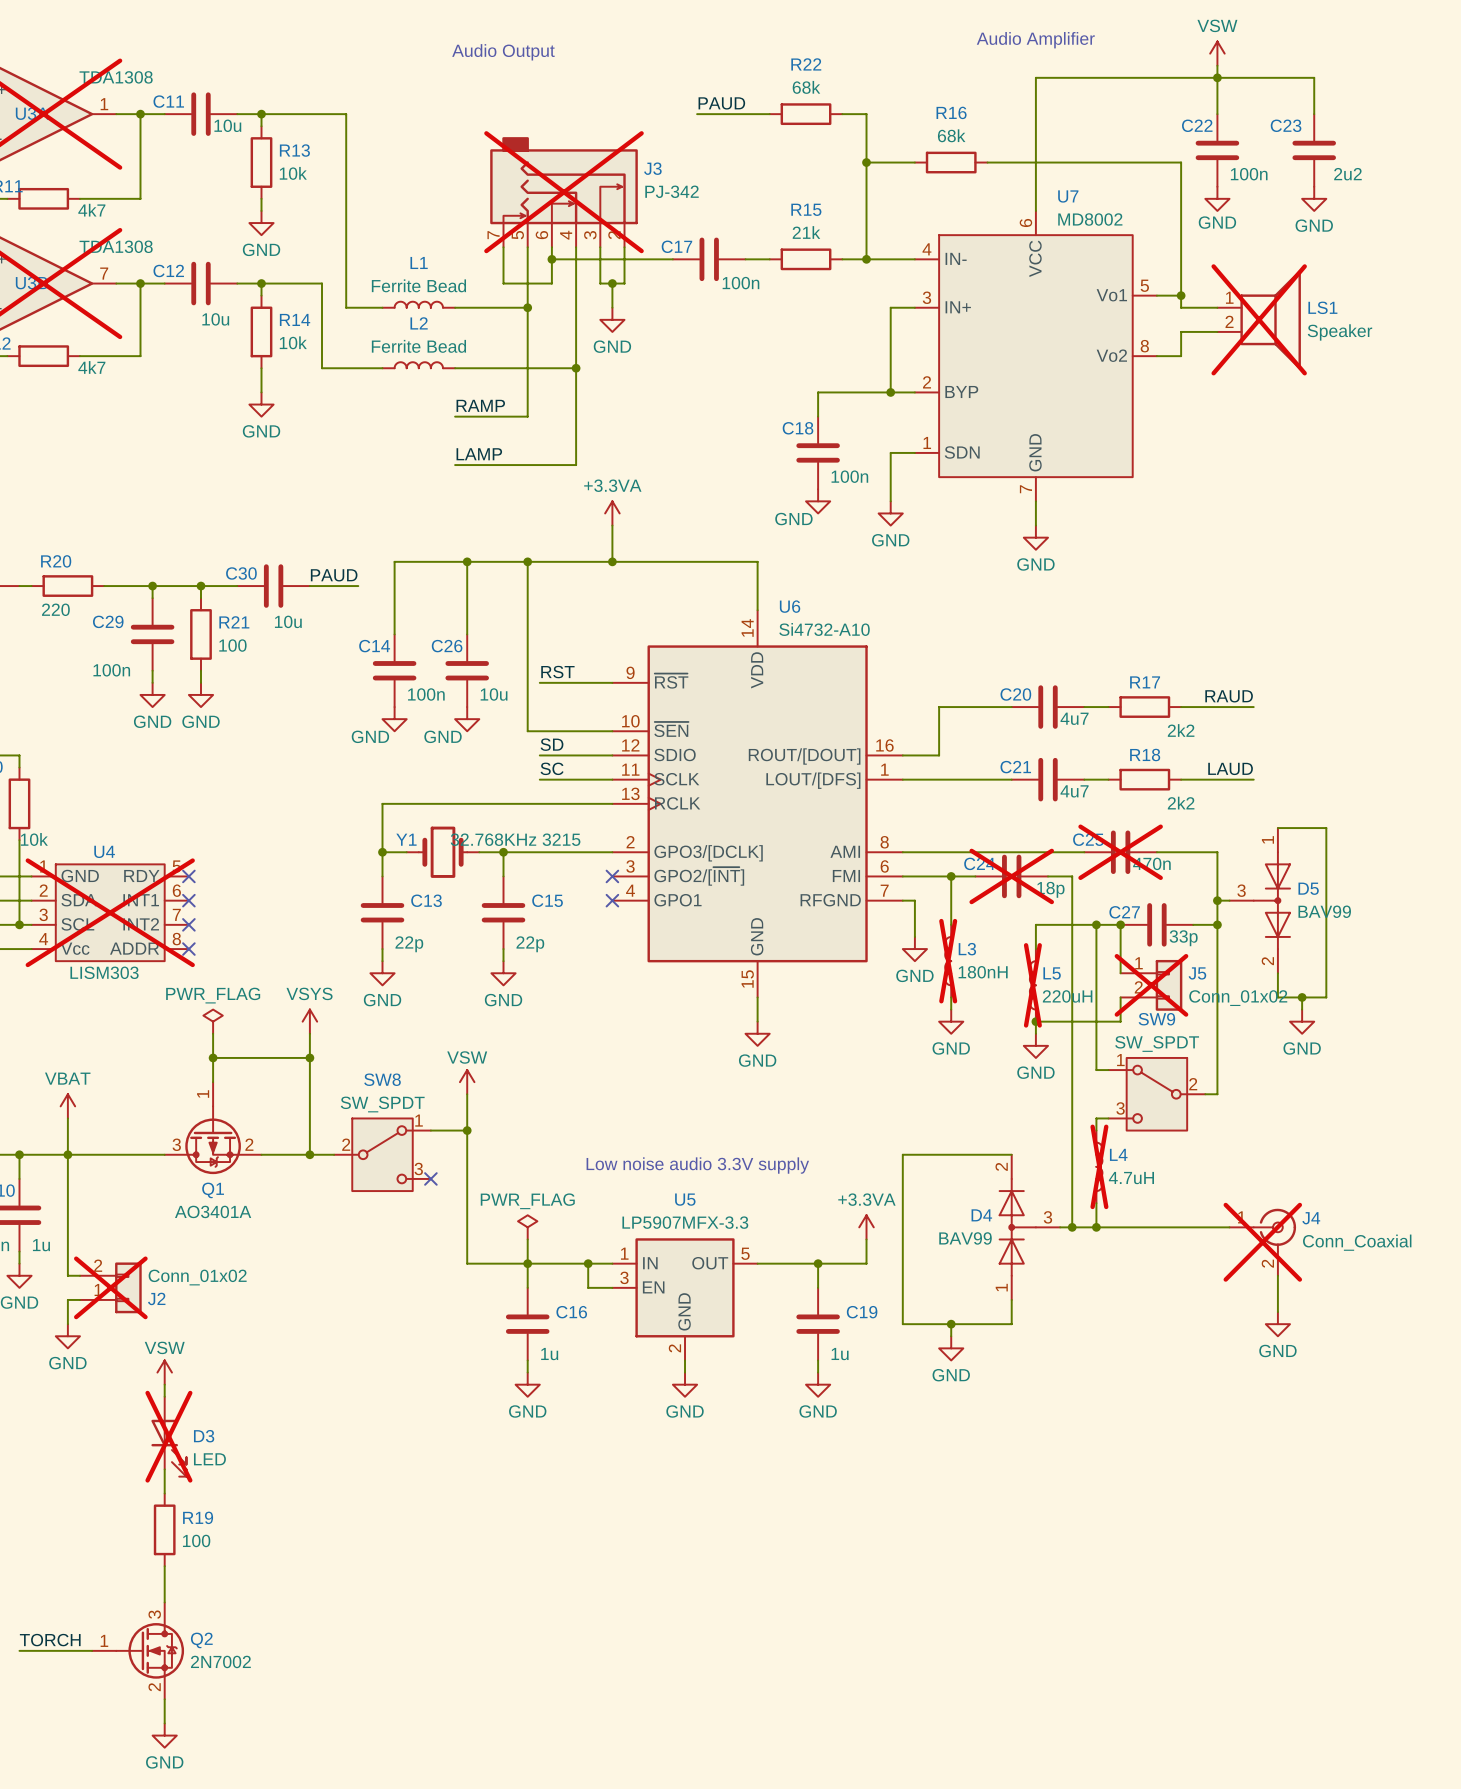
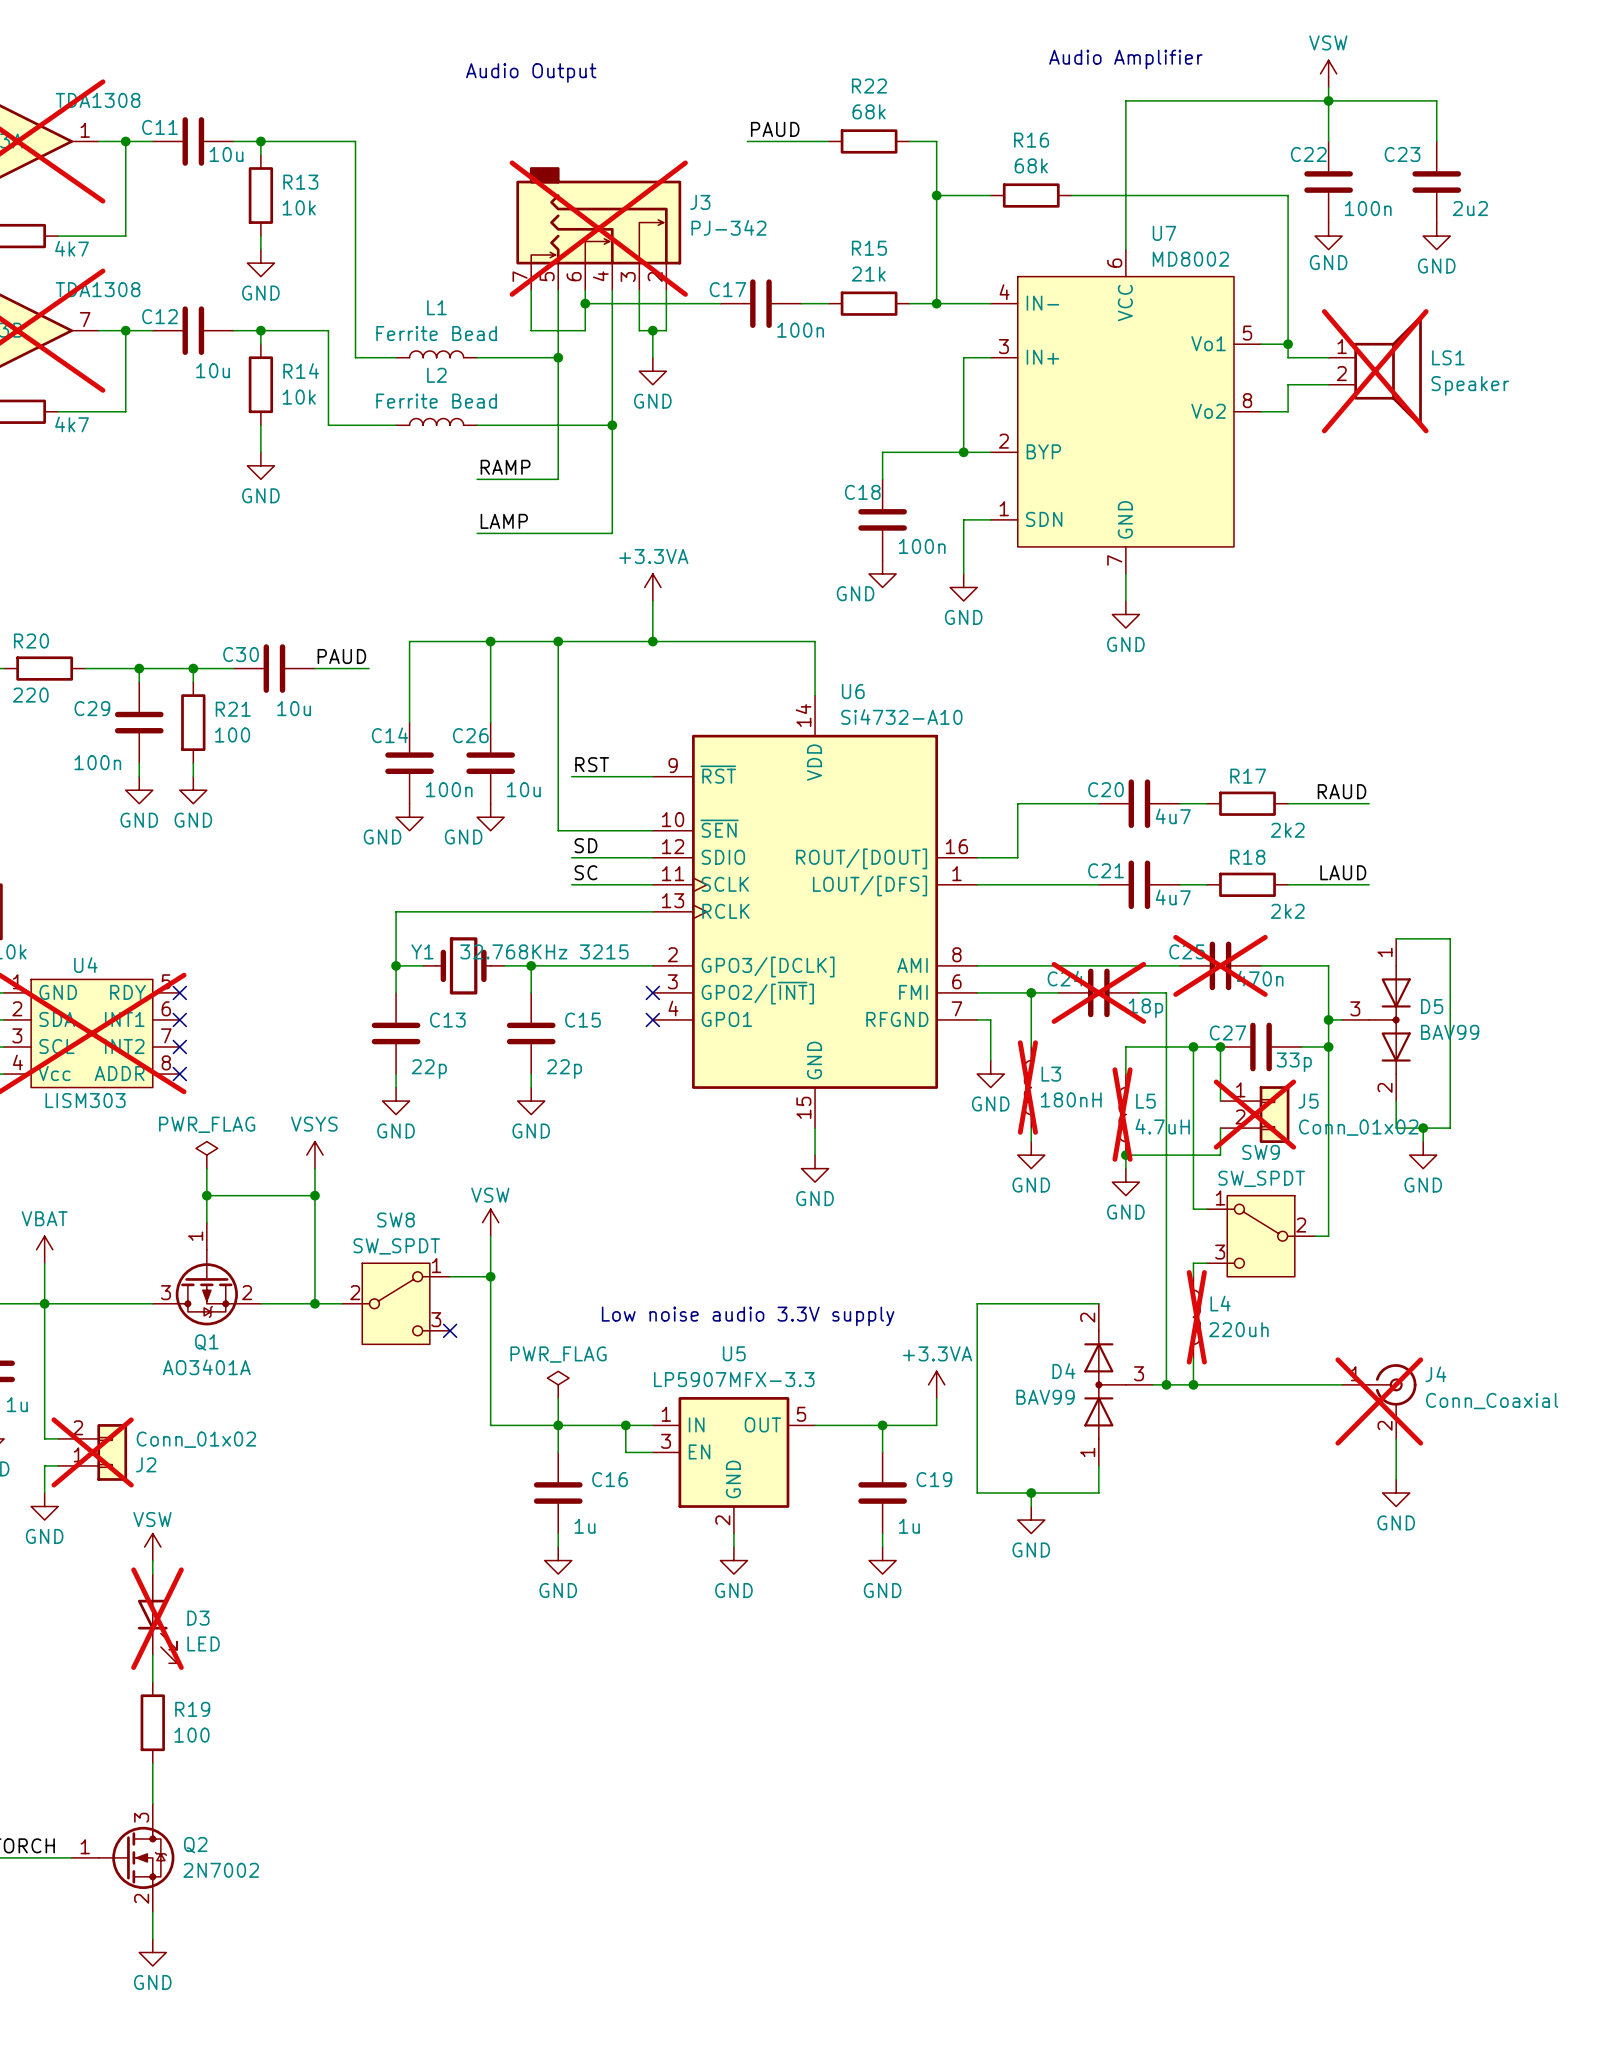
L5 value: 220uH (1067, 996) -> 4.7uH (1162, 1126)
L4 value: 4.7uH (1131, 1178) -> 220uh (1238, 1329)

